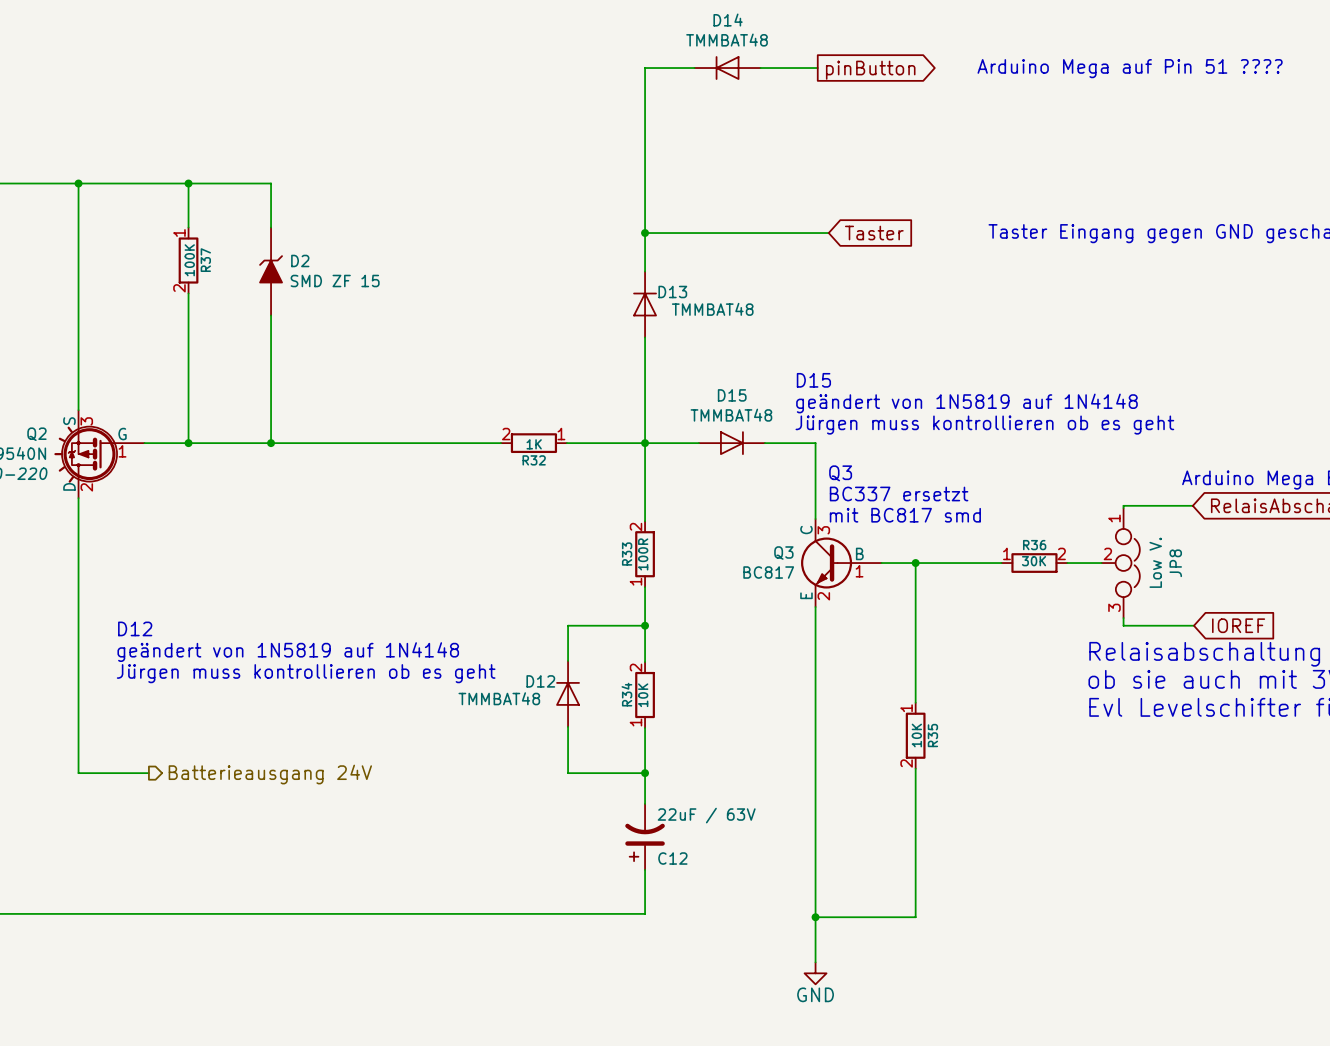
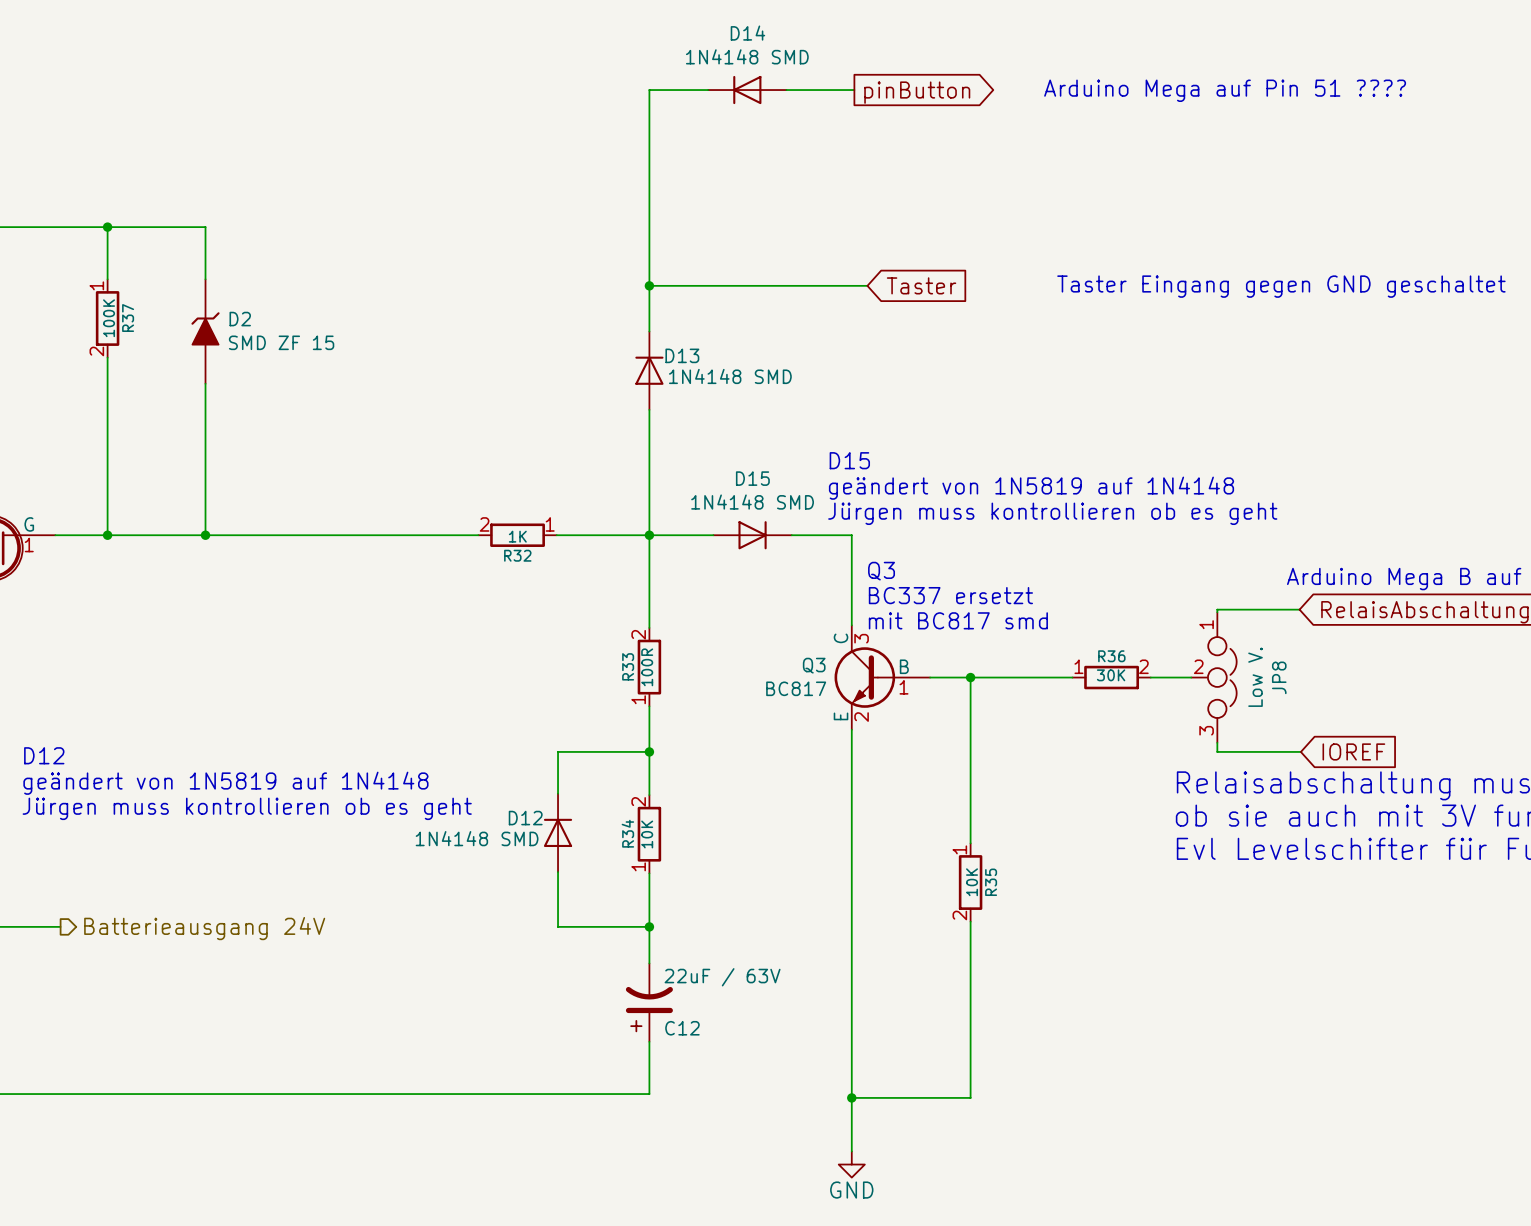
D14 value: TMMBAT48 (727, 40) -> 1N4148 SMD (747, 56)
D13 value: TMMBAT48 (712, 309) -> 1N4148 SMD (730, 376)
D15 value: TMMBAT48 (731, 415) -> 1N4148 SMD (752, 502)
D12 value: TMMBAT48 (499, 698) -> 1N4148 SMD (477, 838)

